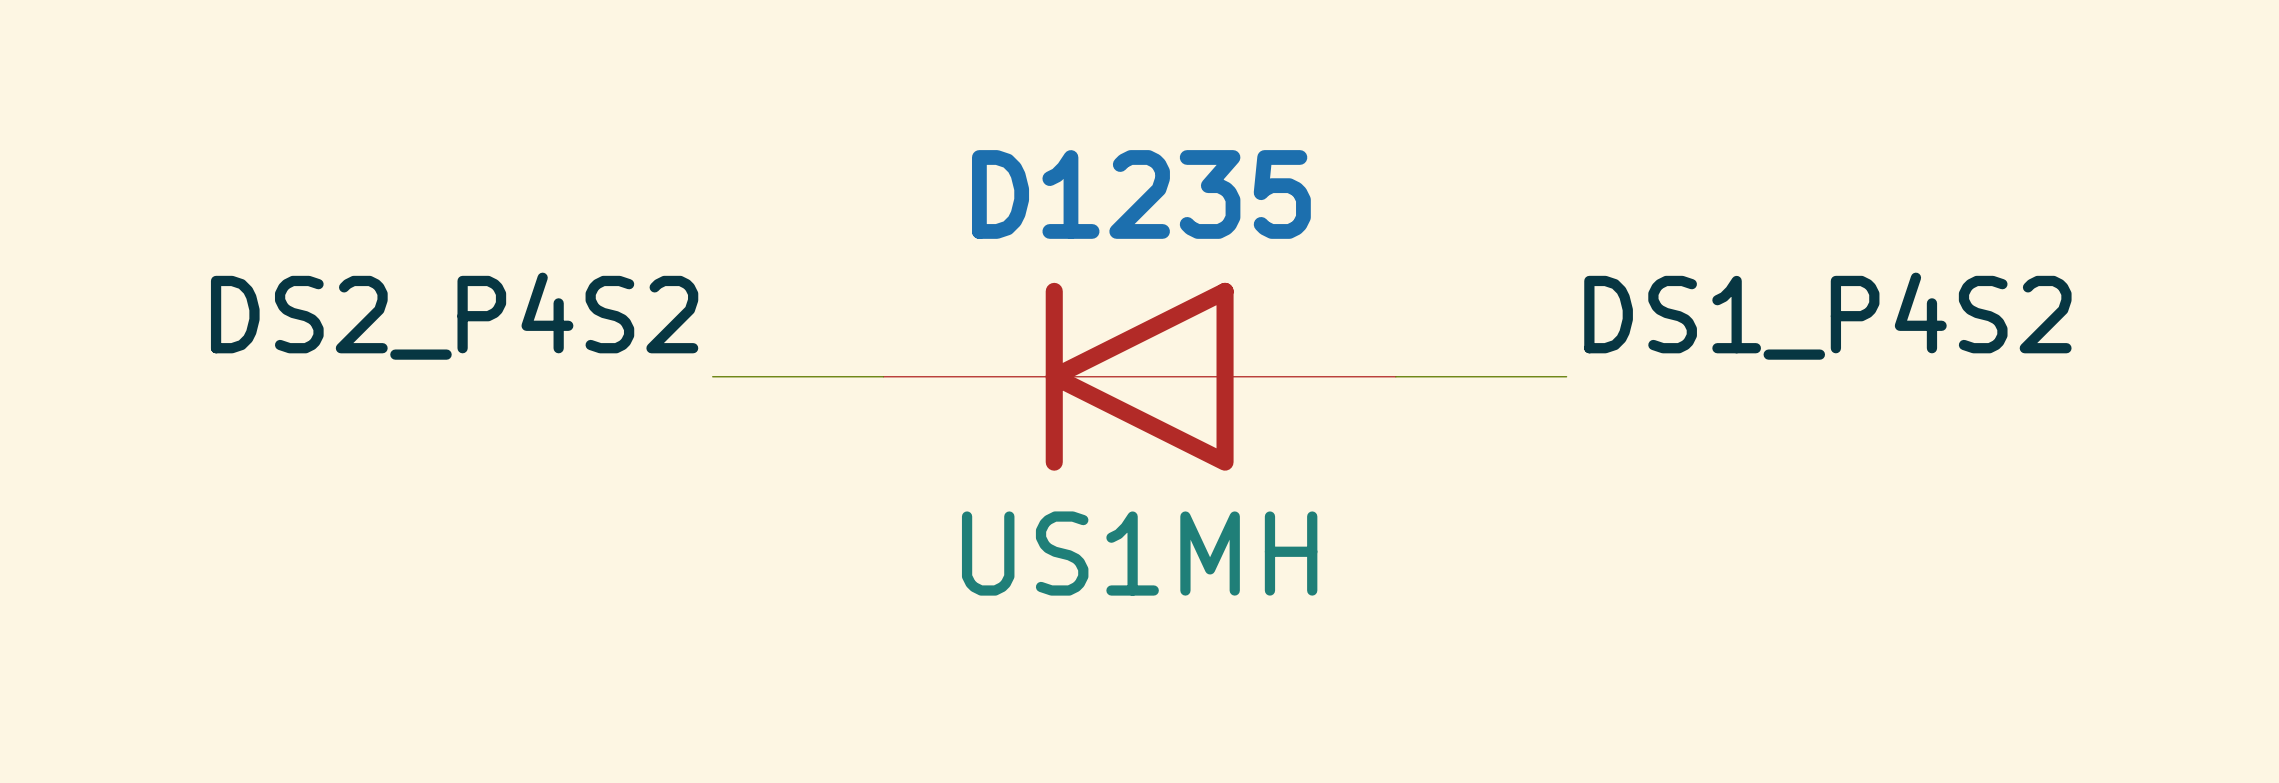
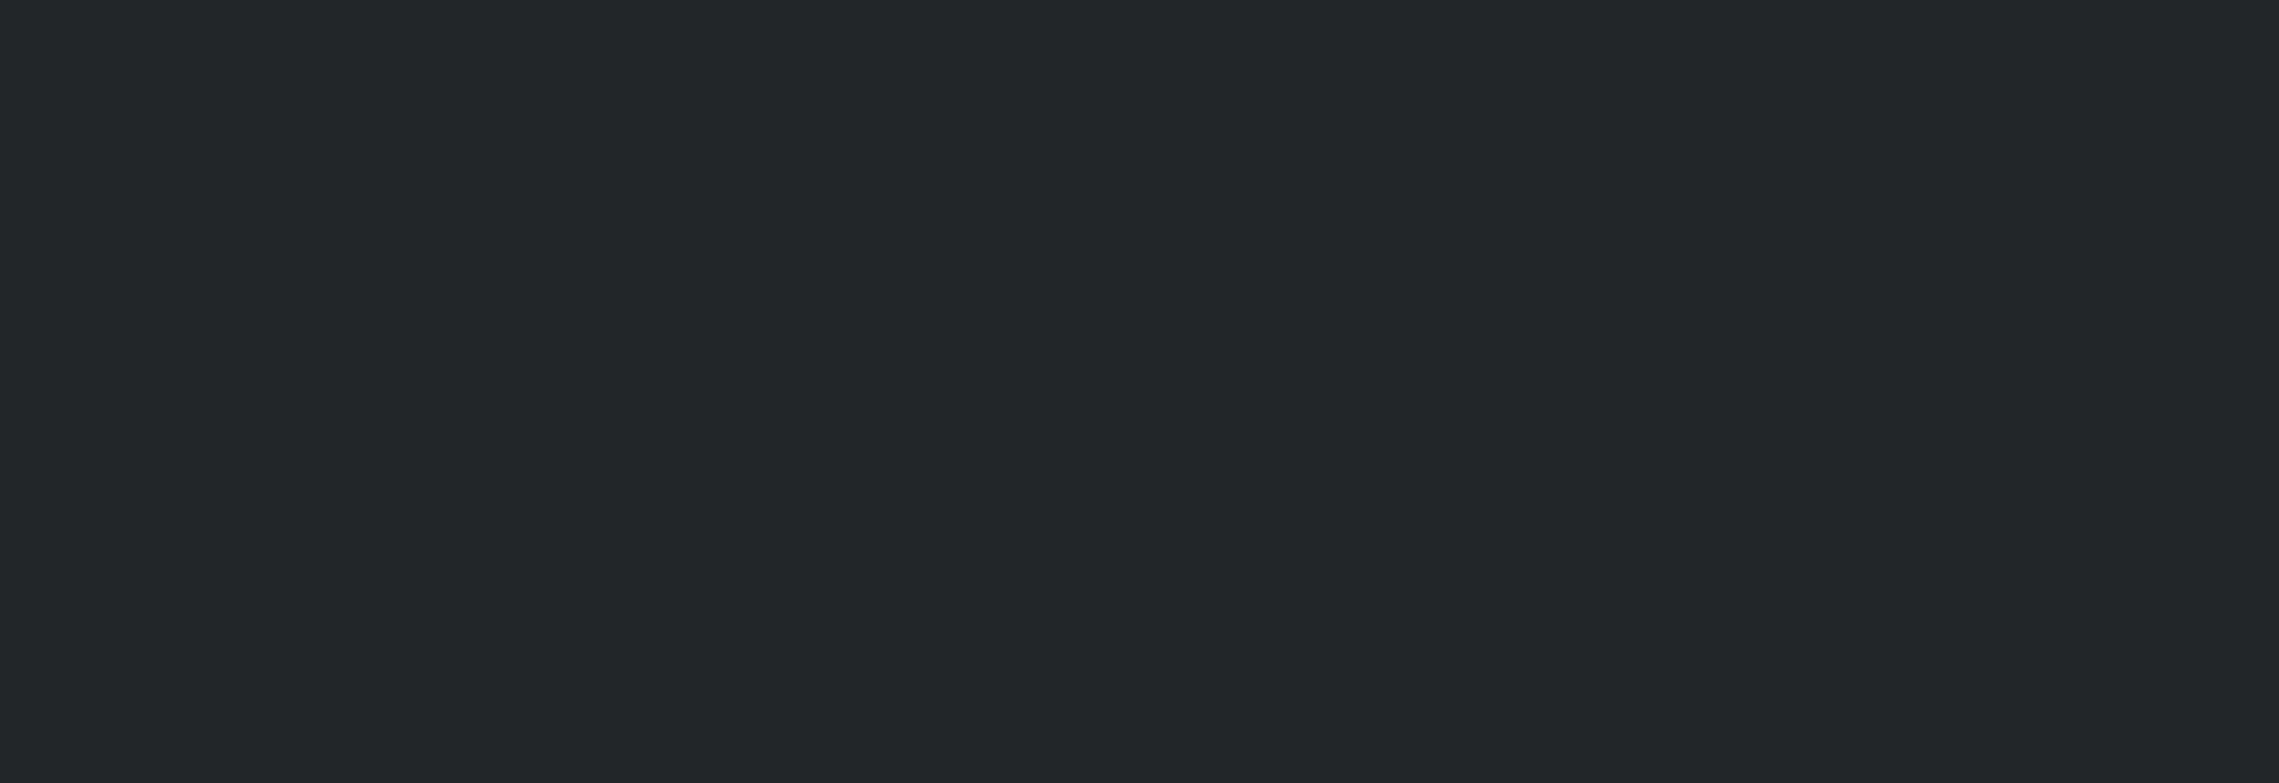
label: DS2_P4S2 (454, 316) -> none
label: DS1_P4S2 (1827, 316) -> none
wire: (712, 376) (883, 376) -> none
D1235: US1MH (1139, 376) -> none
wire: (1395, 376) (1566, 376) -> none

